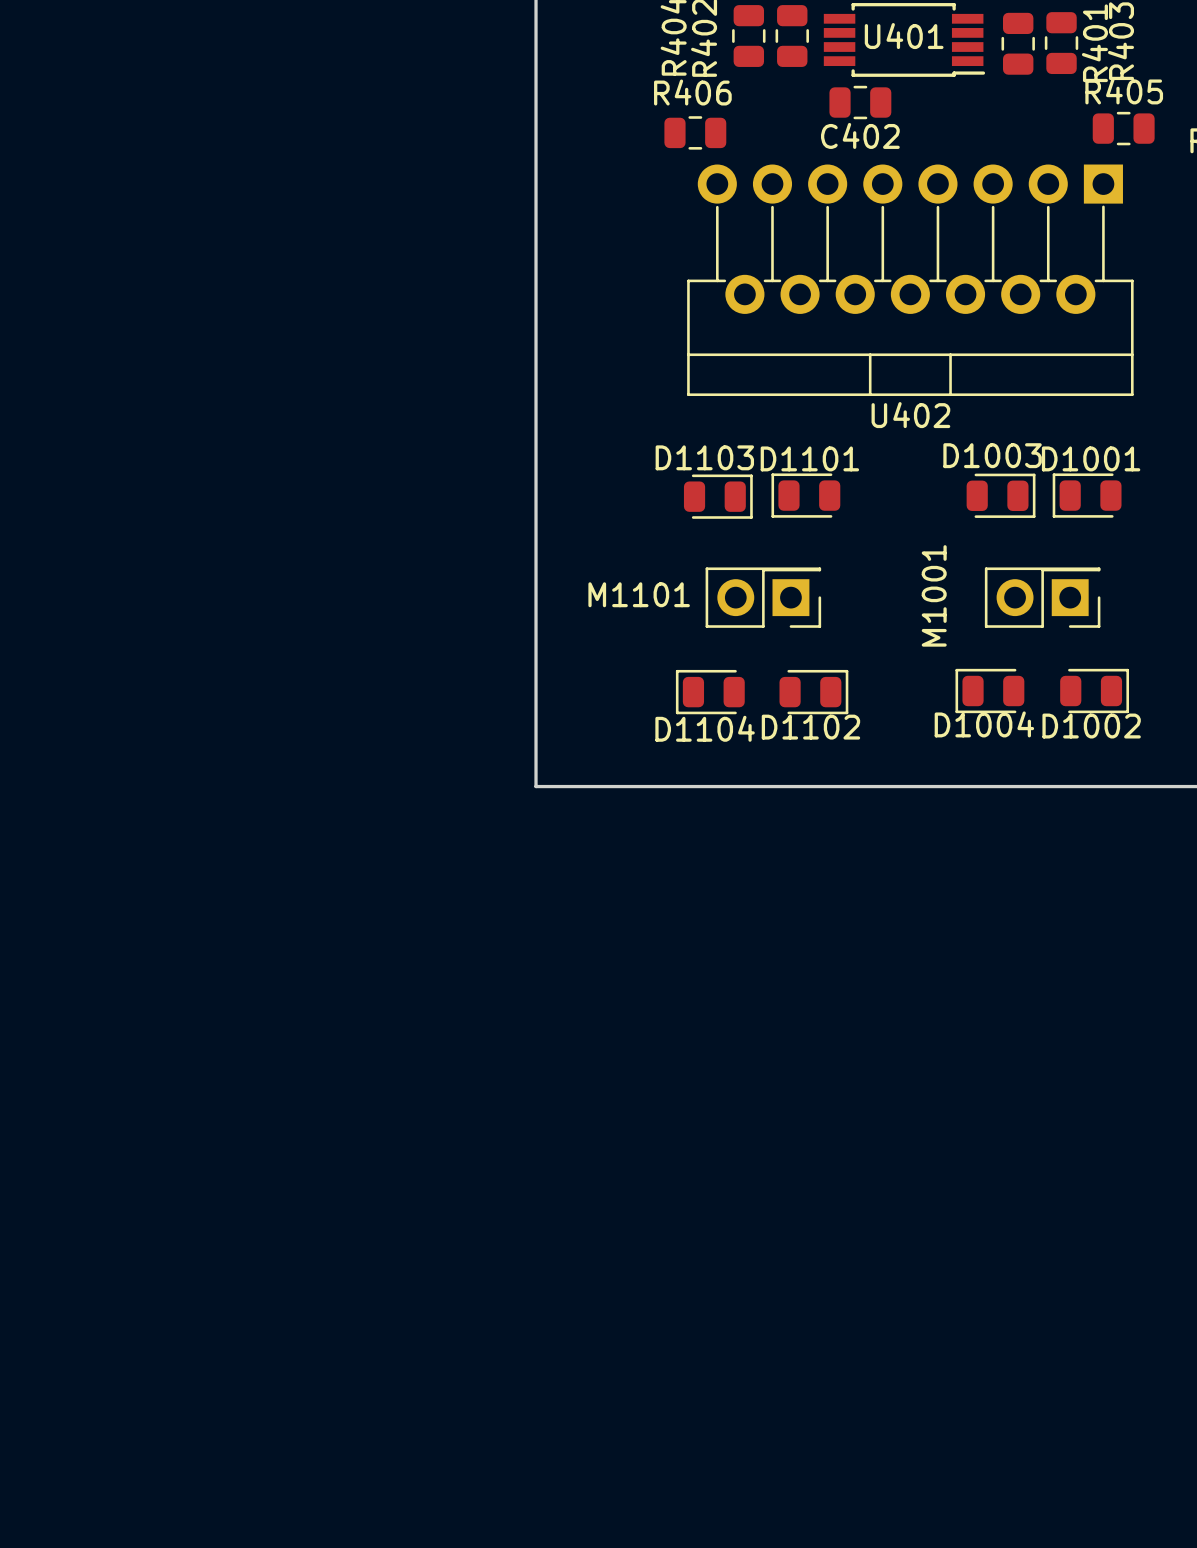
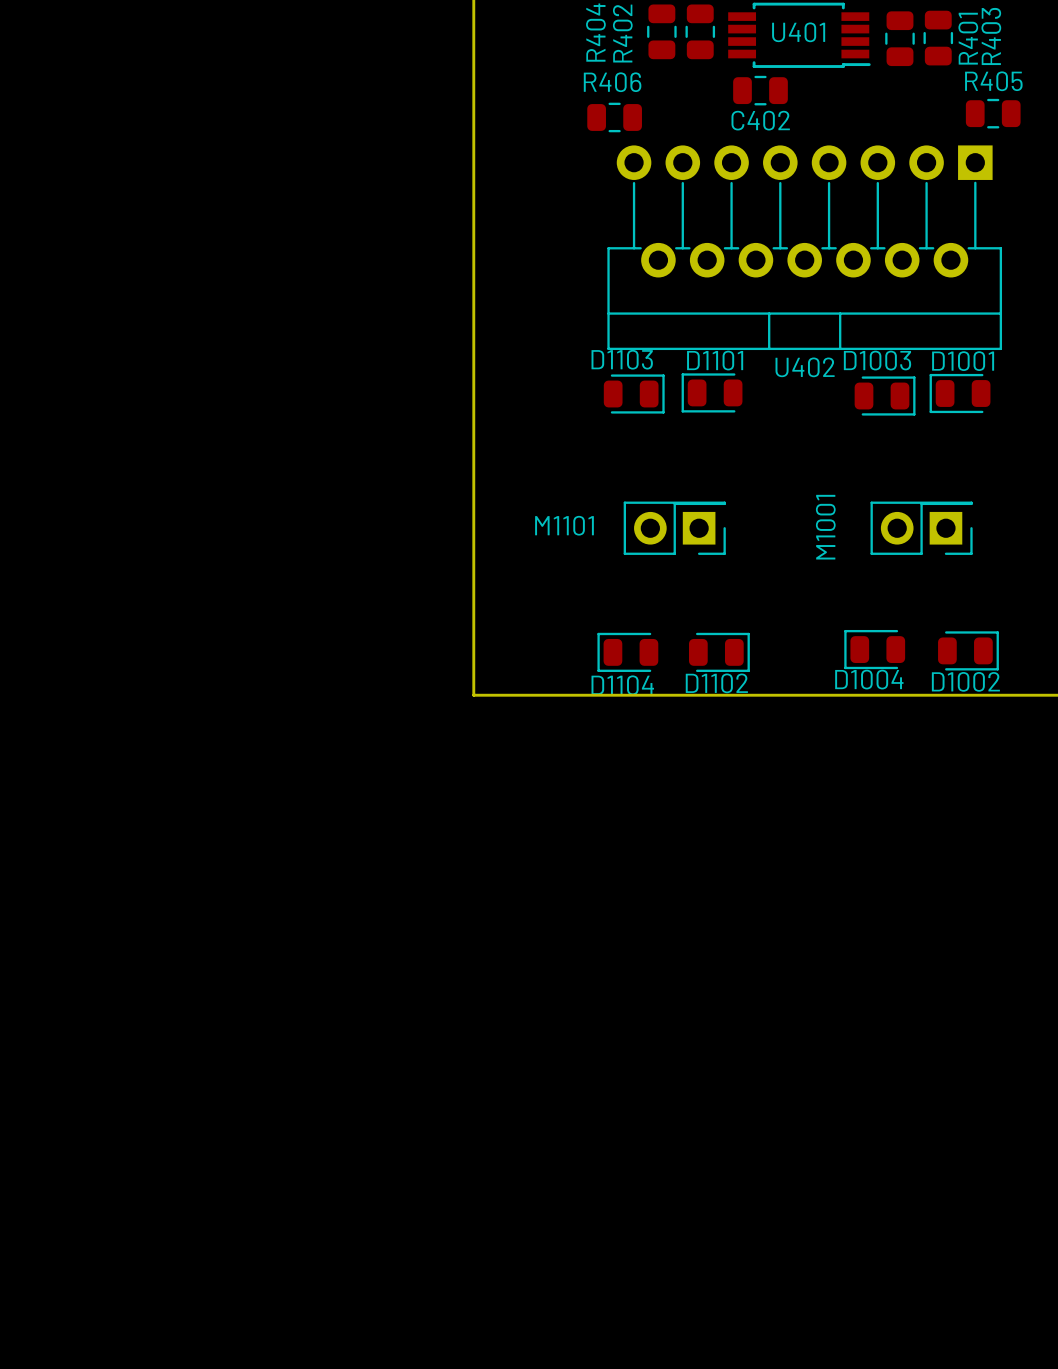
D1101 position: (805, 495) -> (712, 392)
D1003 position: (1001, 495) -> (885, 396)
D1001 position: (1087, 495) -> (960, 393)
D1103 position: (718, 496) -> (634, 394)
D1004 position: (989, 691) -> (874, 649)
D1002 position: (1094, 691) -> (968, 650)
D1104 position: (710, 692) -> (627, 652)
D1102 position: (813, 692) -> (719, 652)

